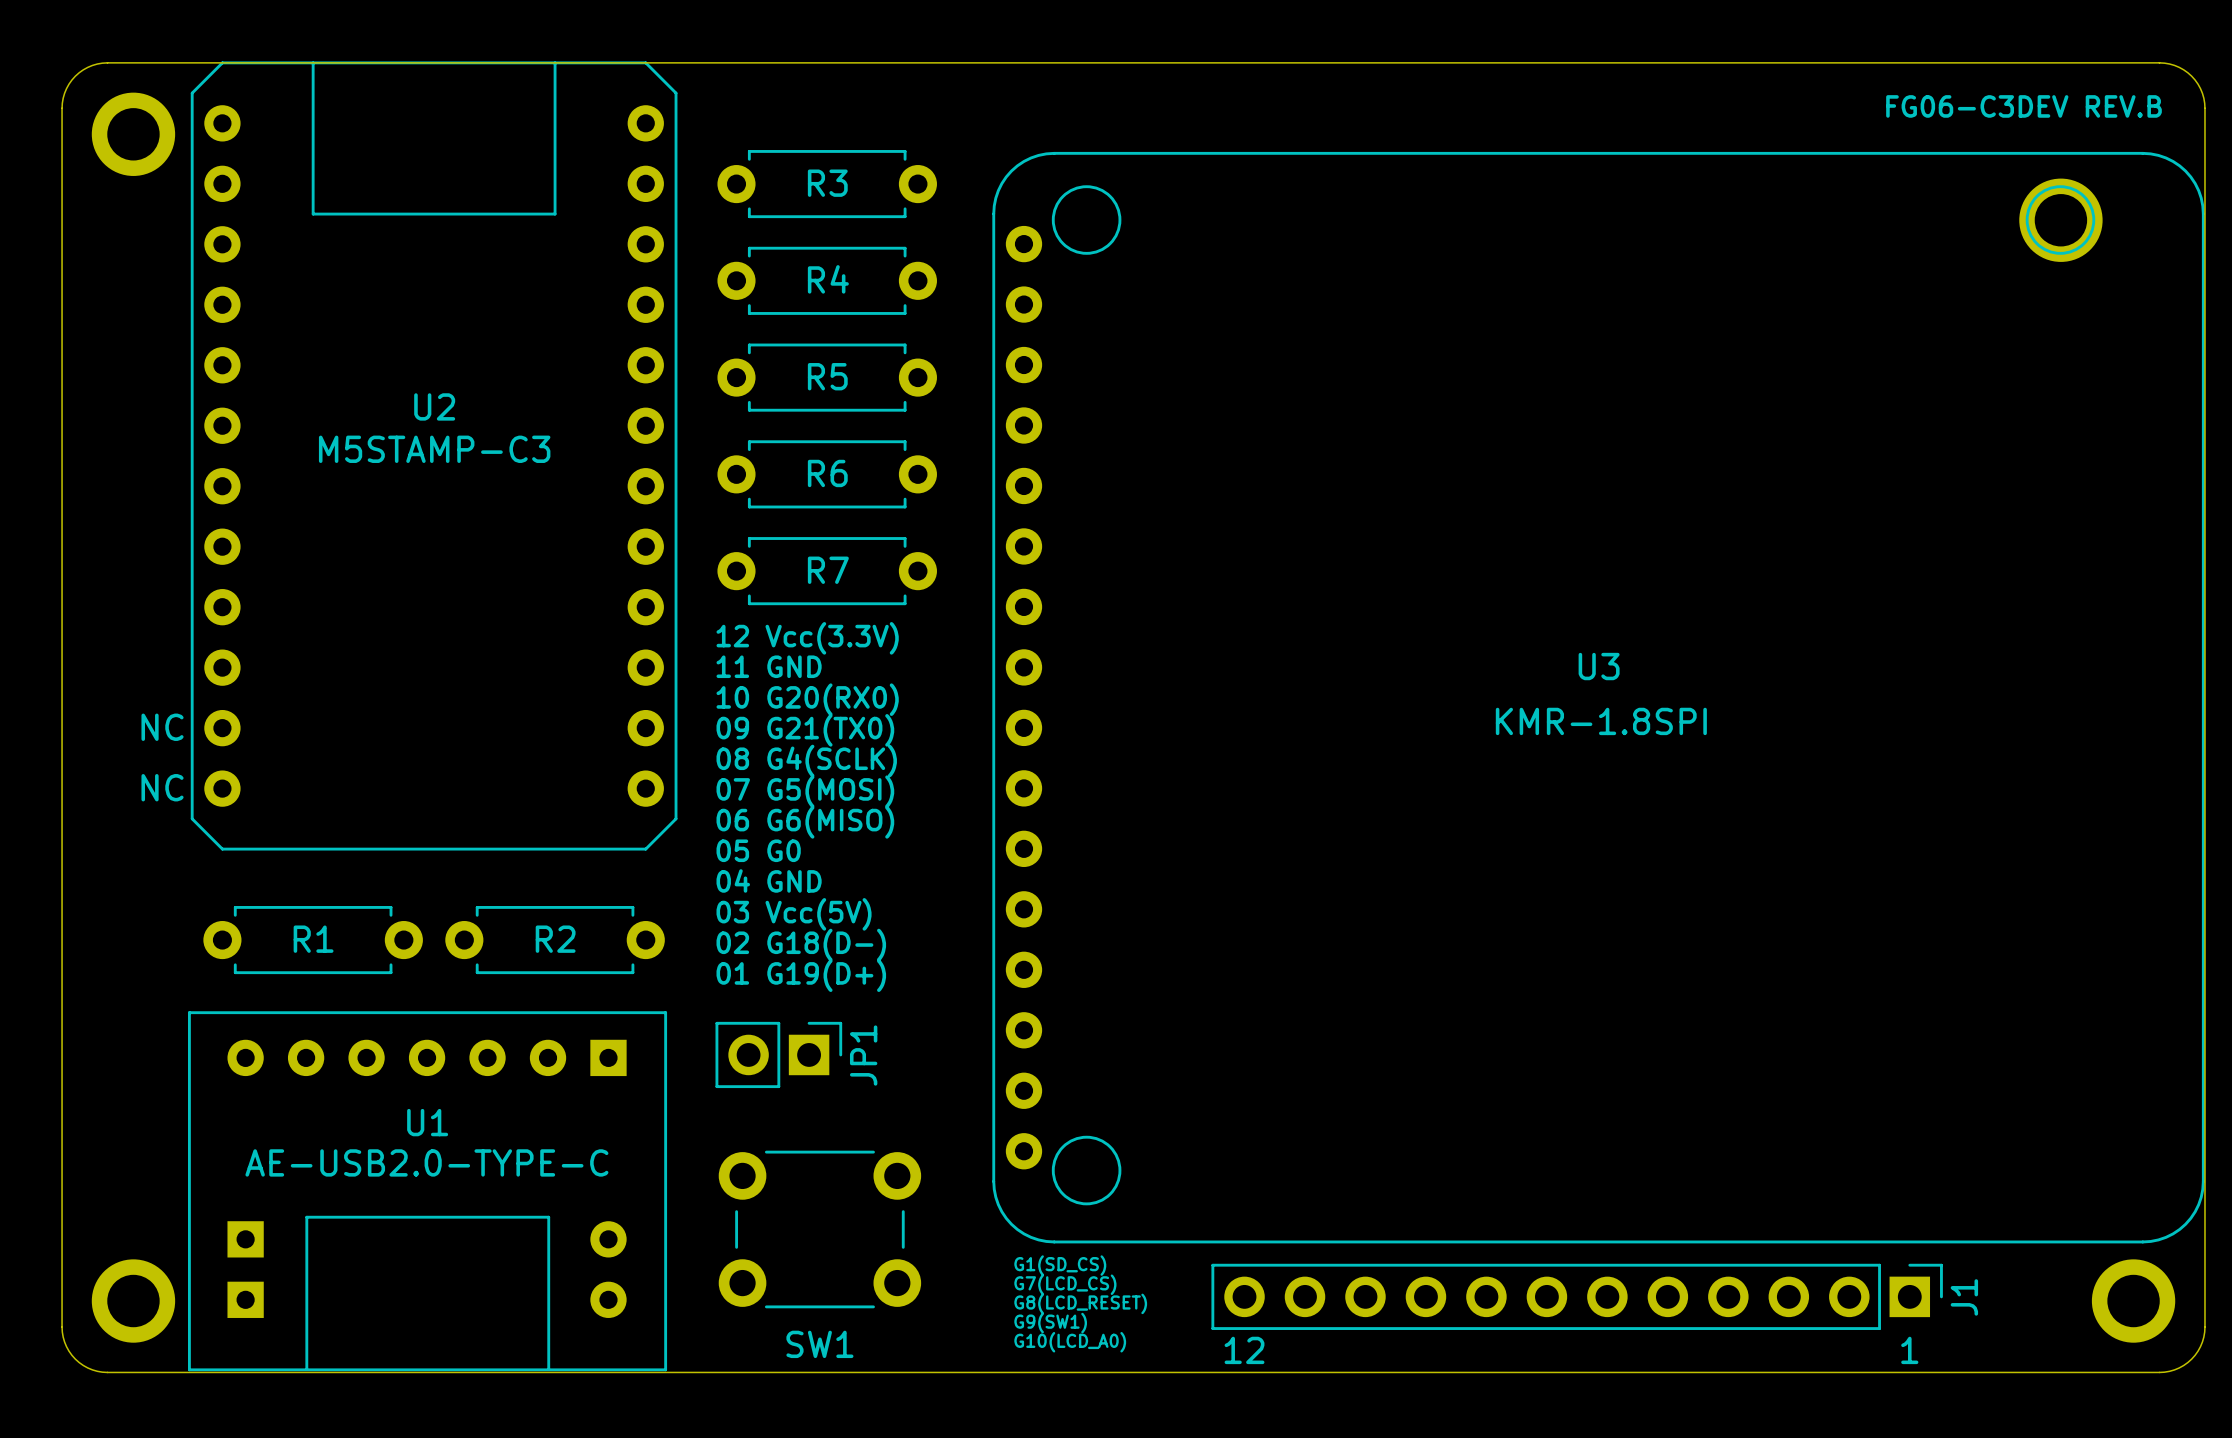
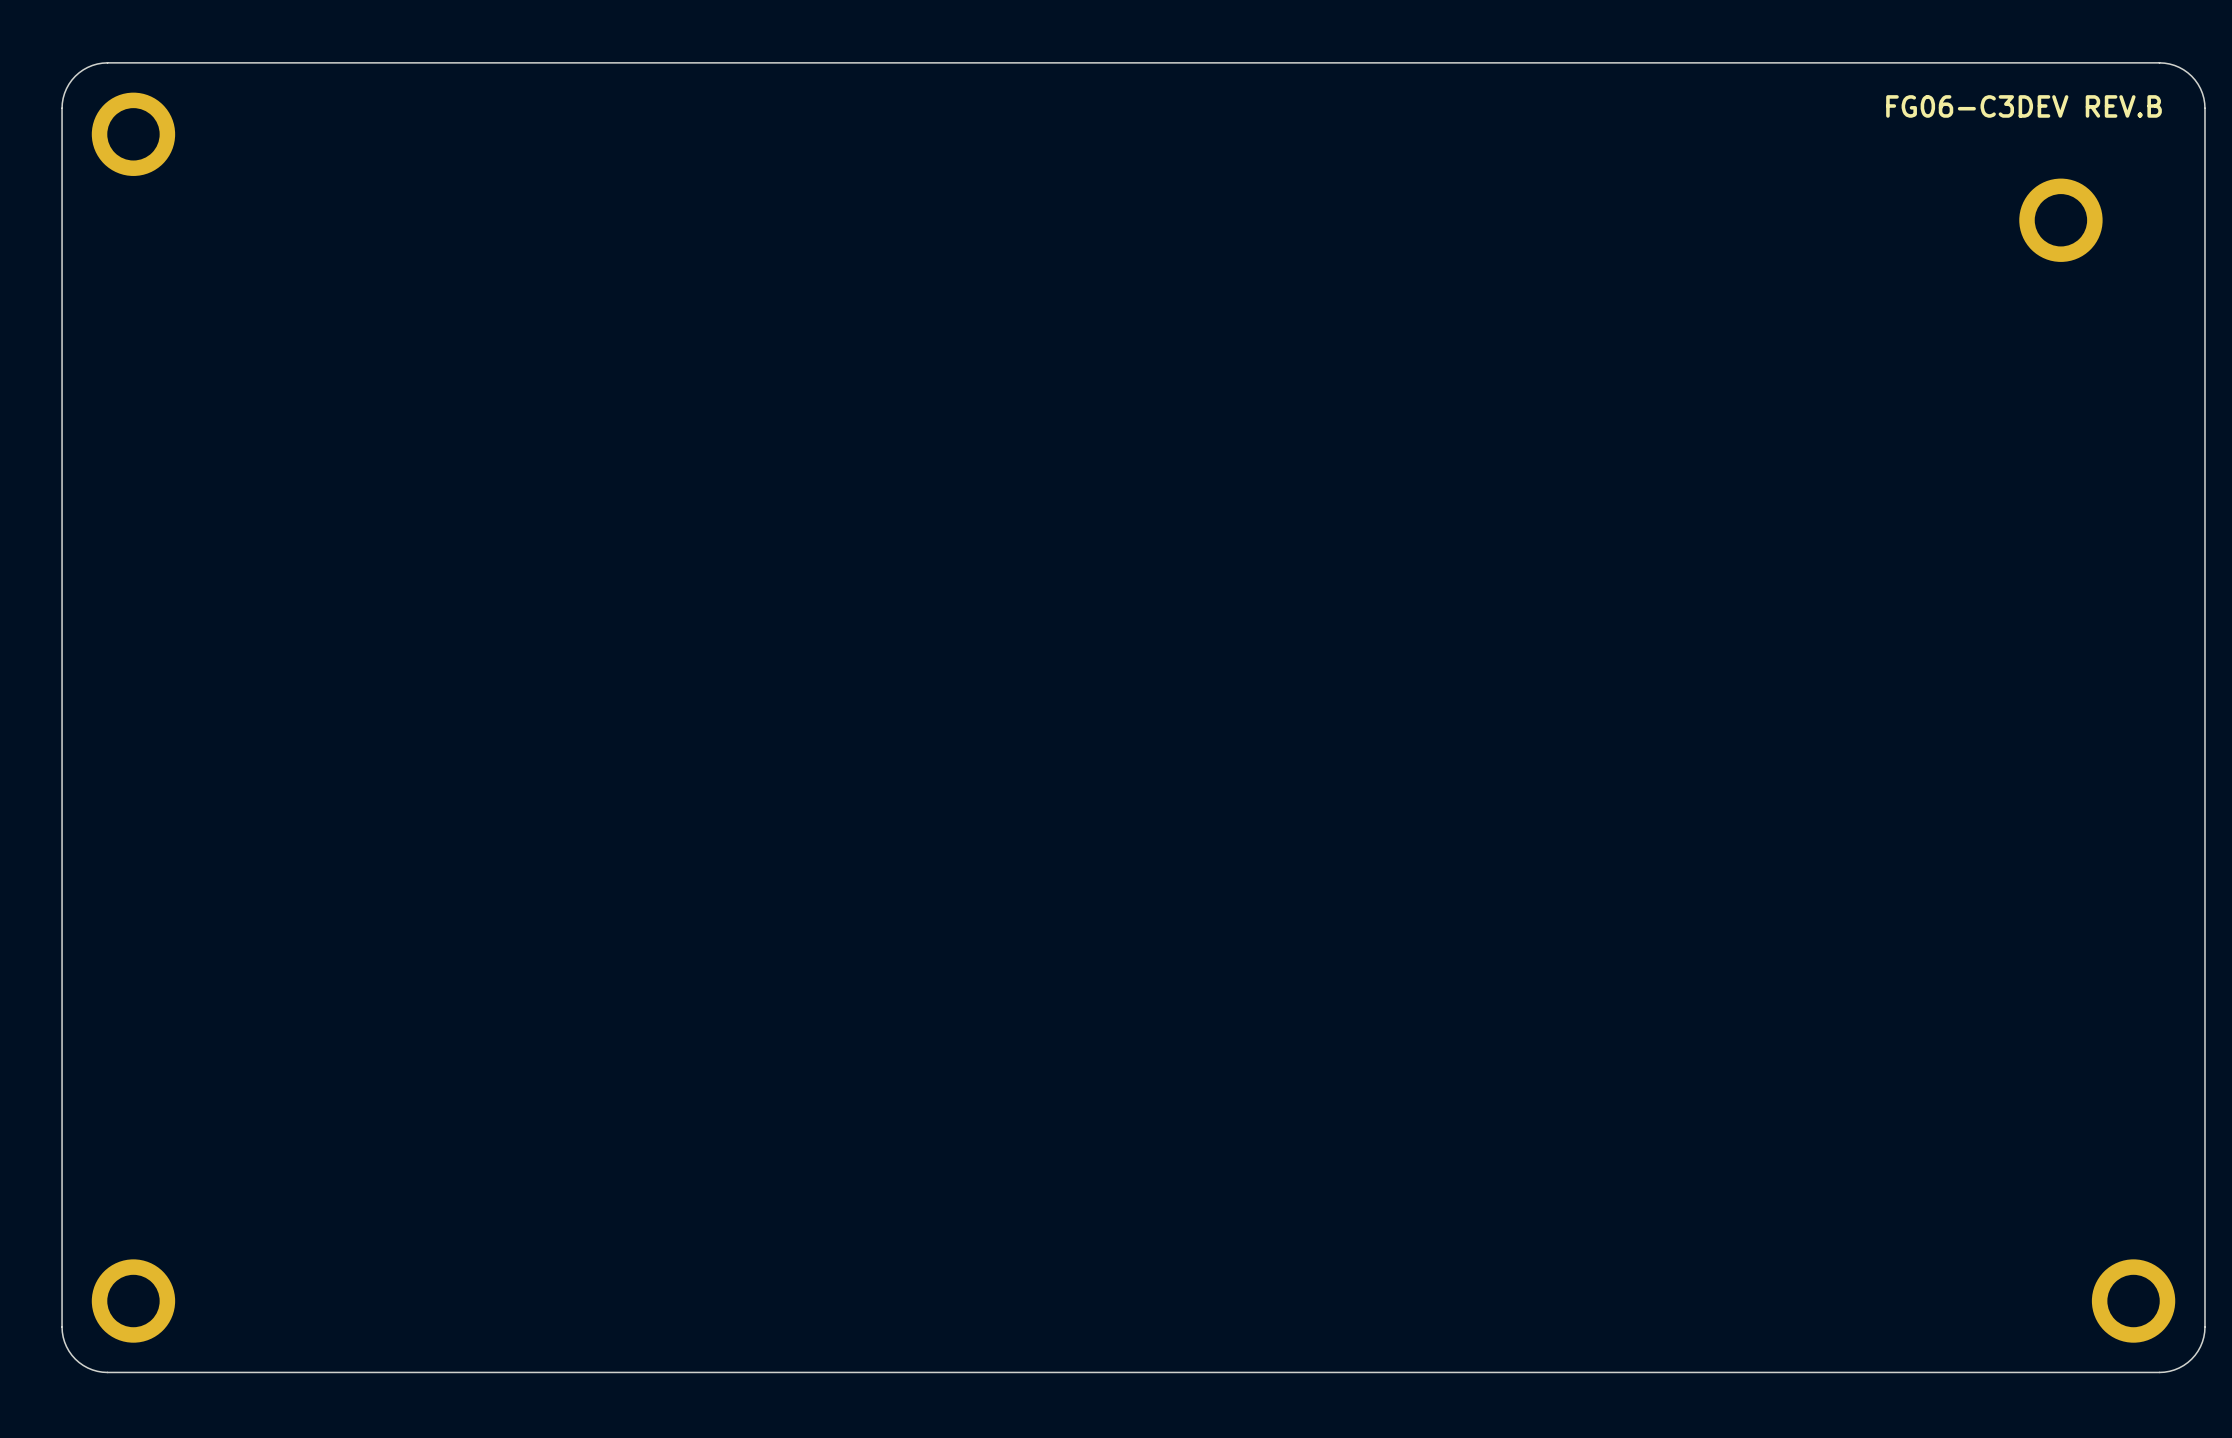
R3: (827, 184) -> none
R4: (827, 280) -> none
R5: (827, 377) -> none
text: M5STAMP-C3 (434, 449) -> none
U2: (434, 455) -> none
R6: (827, 474) -> none
R7: (827, 571) -> none
text: 12 Vcc(3.3V) (807, 638) -> none
text: 11 GND (769, 666) -> none
U3: (1598, 697) -> none
text: 10 G20(RX0) (807, 699) -> none
text: KMR-1.8SPI (1601, 721) -> none
text: 09 G21(TX0) (805, 730) -> none
text: 08 G4(SCLK) (806, 761) -> none
text: 07 G5(MOSI) (805, 791) -> none
text: 06 G6(MISO) (805, 822) -> none
text: 05 G0 (758, 850) -> none
text: 04 GND (769, 880) -> none
text: 03 Vcc(5V) (794, 914) -> none
R1: (313, 940) -> none
R2: (555, 940) -> none
text: 02 G18(D-) (801, 945) -> none
text: 01 G19(D+) (801, 975) -> none
JP1: (778, 1054) -> none
text: AE-USB2.0-TYPE-C (426, 1162) -> none
U1: (427, 1191) -> none
SW1: (819, 1229) -> none
text: G1(SD_CS) (1060, 1265) -> none
text: G7(LCD_CS) (1065, 1284) -> none
J1: (1577, 1296) -> none
text: G8(LCD_RESET) (1080, 1303) -> none
text: G9(SW1) (1050, 1323) -> none
text: G10(LCD_A0) (1070, 1342) -> none
text: 12 (1244, 1350) -> none
text: 1 (1909, 1350) -> none

